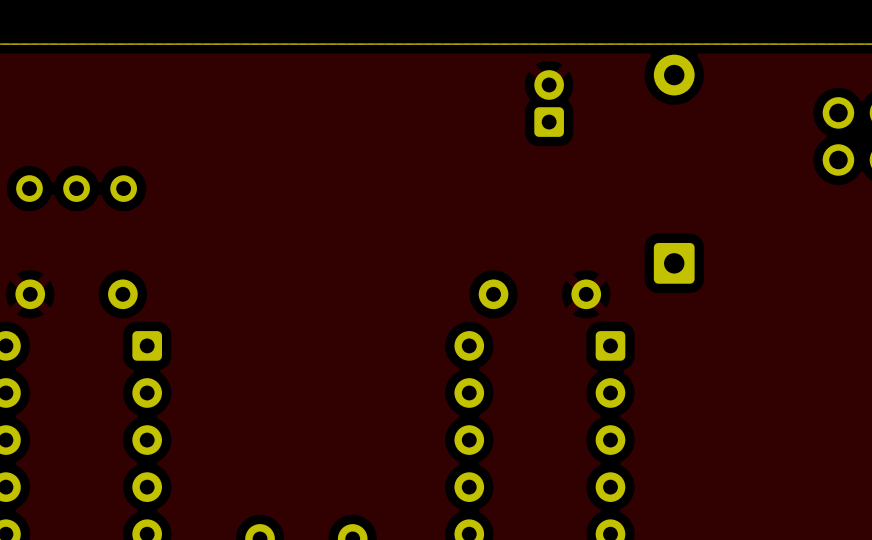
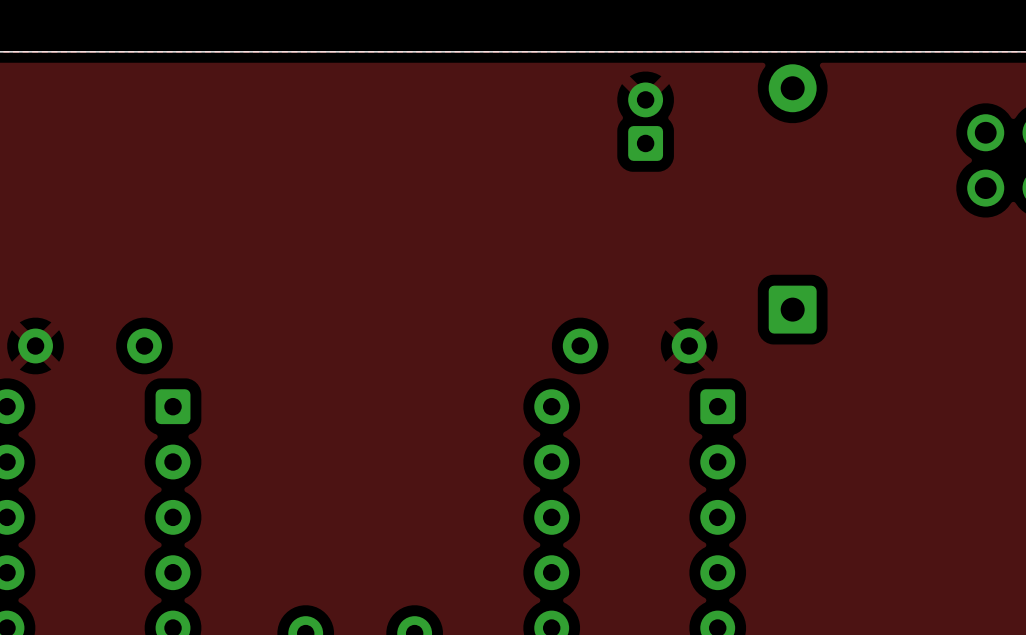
part: (76, 188) -> none

